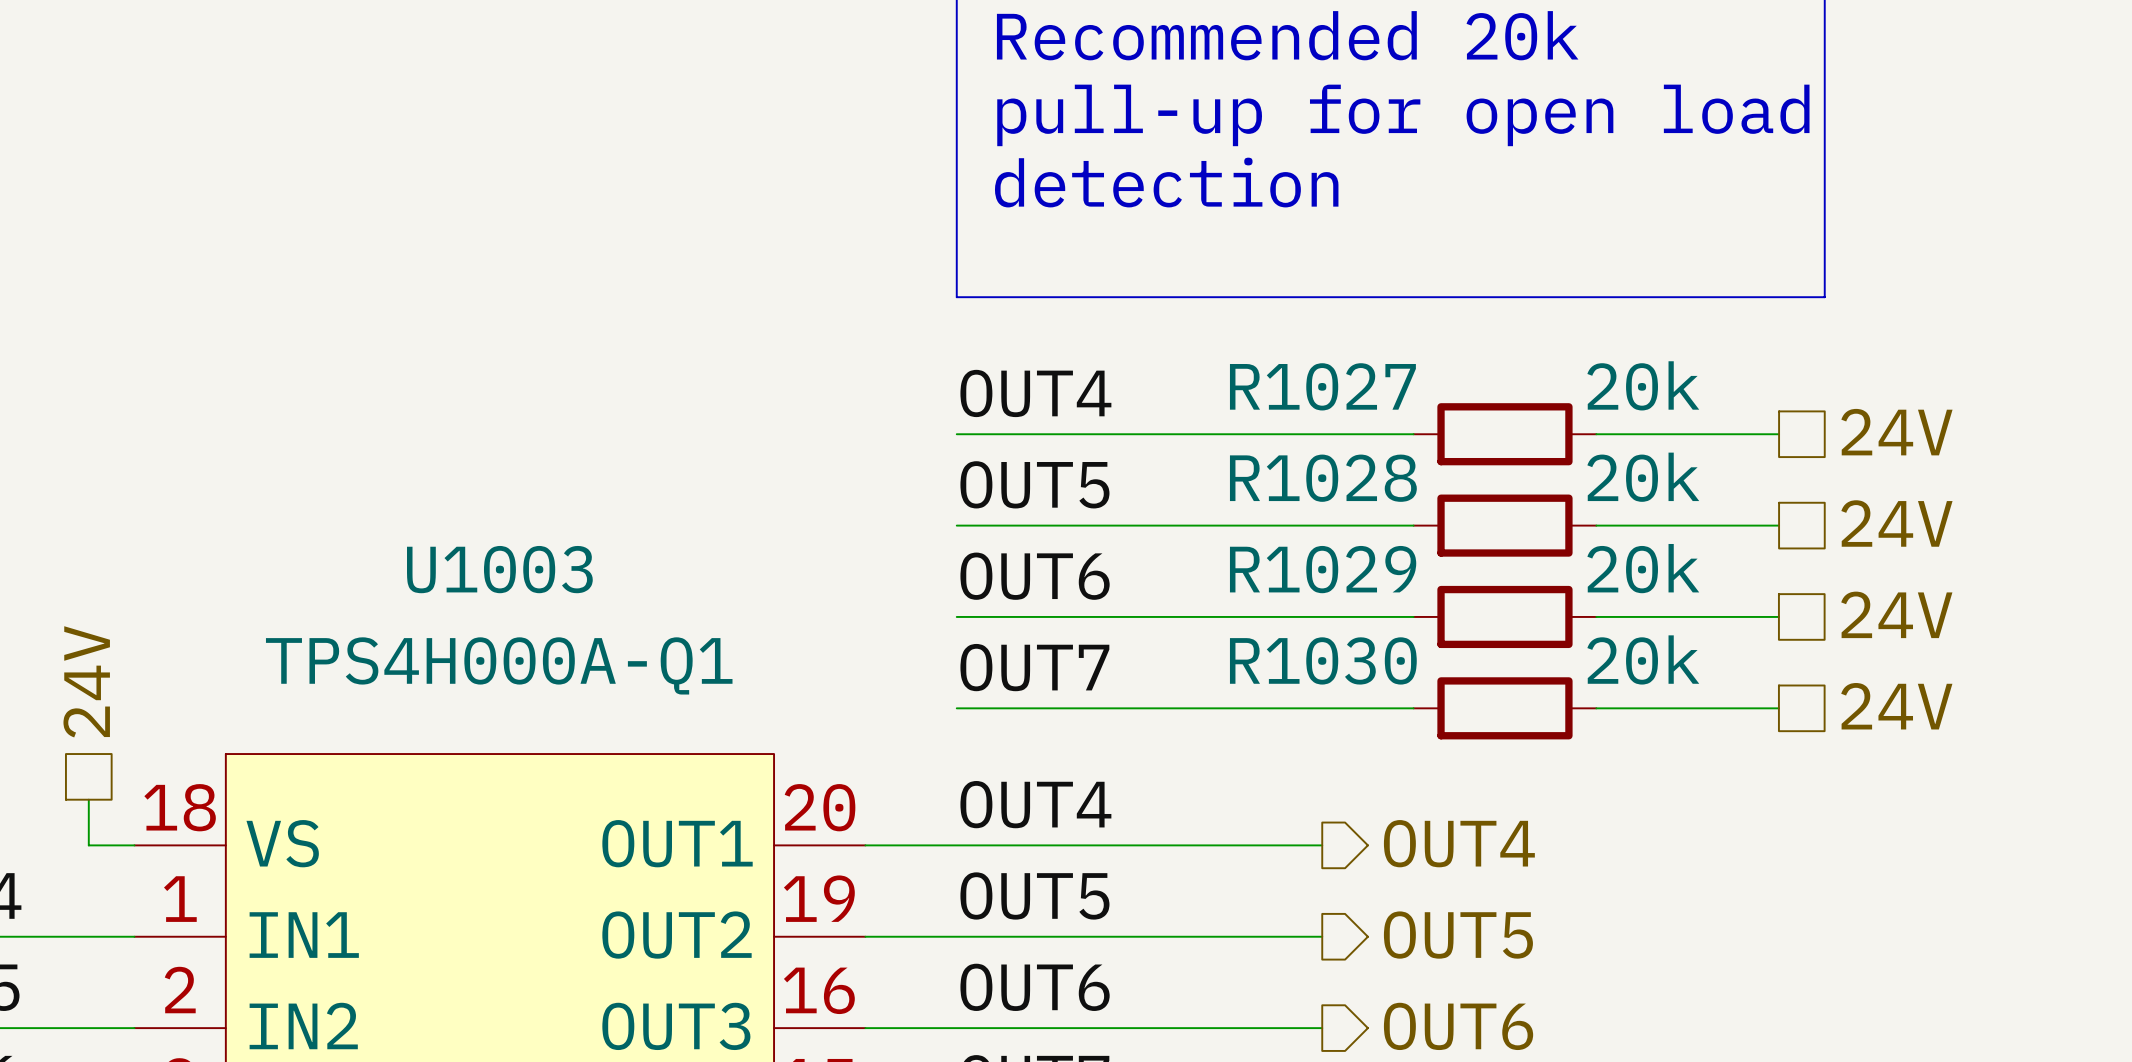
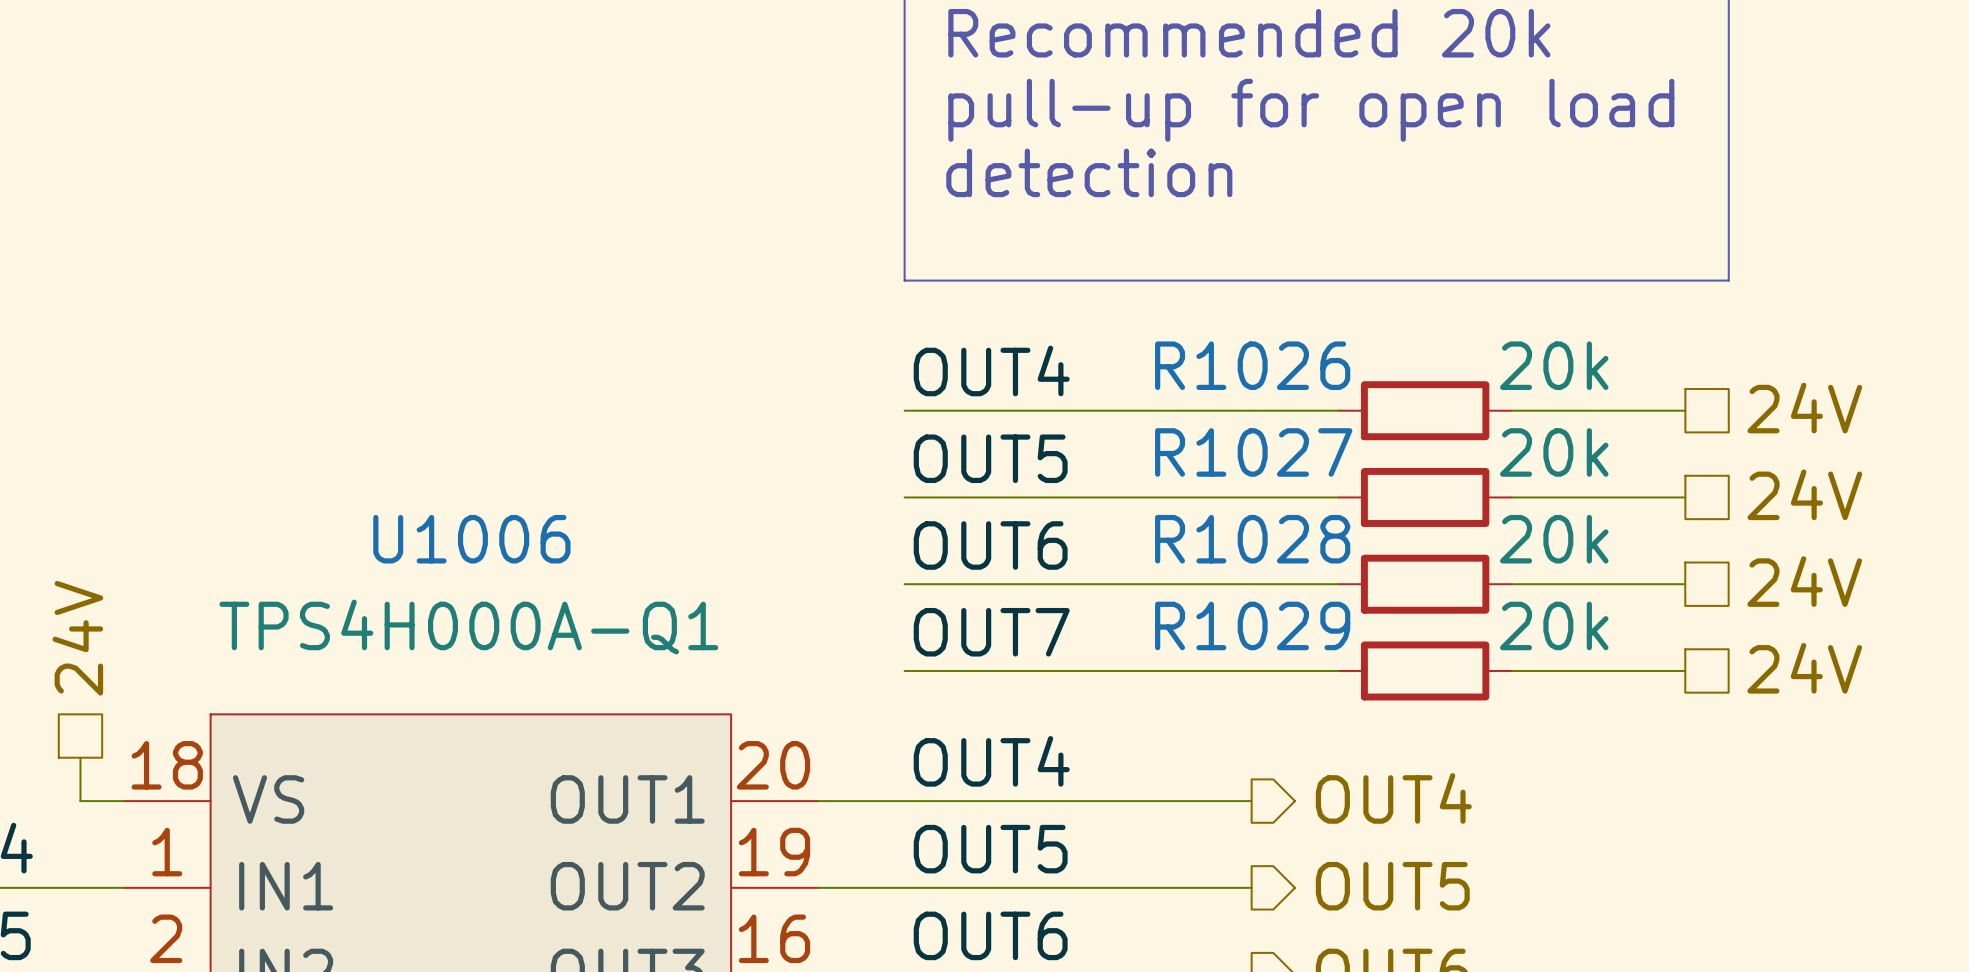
R1027 name: R1027 (1322, 386) -> R1026 (1252, 365)
R1028 name: R1028 (1323, 478) -> R1027 (1253, 452)
U1003 name: U1003 (499, 569) -> U1006 (471, 539)
R1029 name: R1029 (1323, 569) -> R1028 (1252, 539)
R1030 name: R1030 (1323, 660) -> R1029 (1252, 625)

